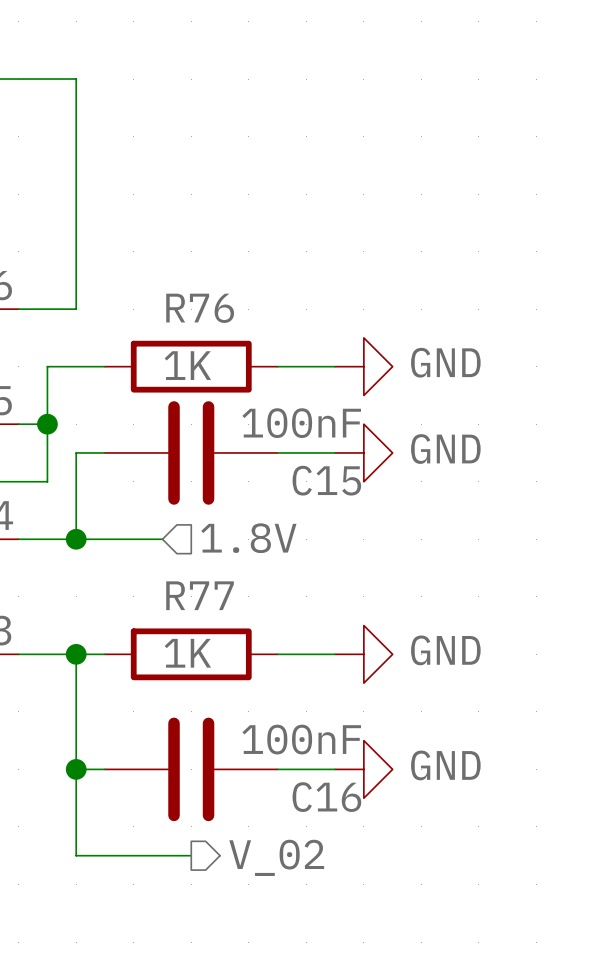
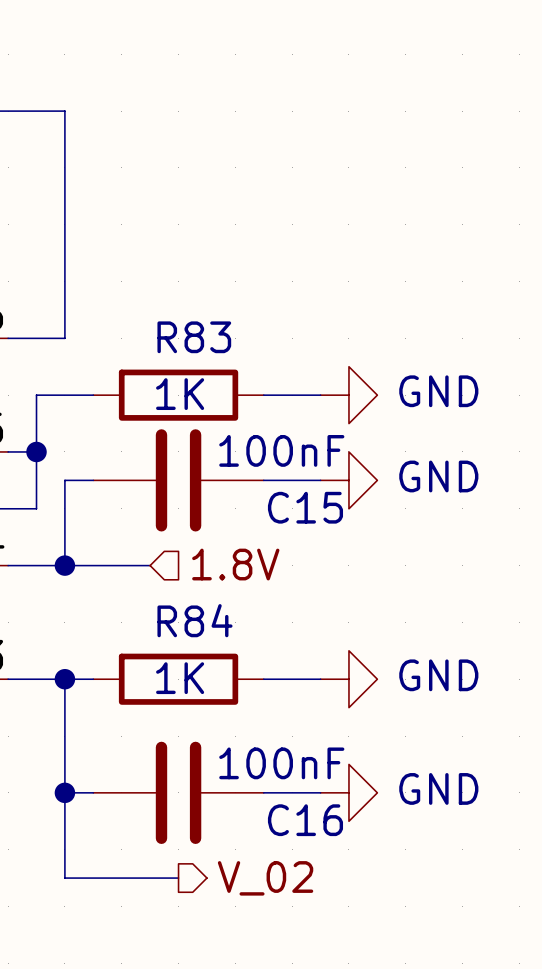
R76 name: R76 (200, 308) -> R83 (194, 337)
R77 name: R77 (200, 595) -> R84 (194, 620)

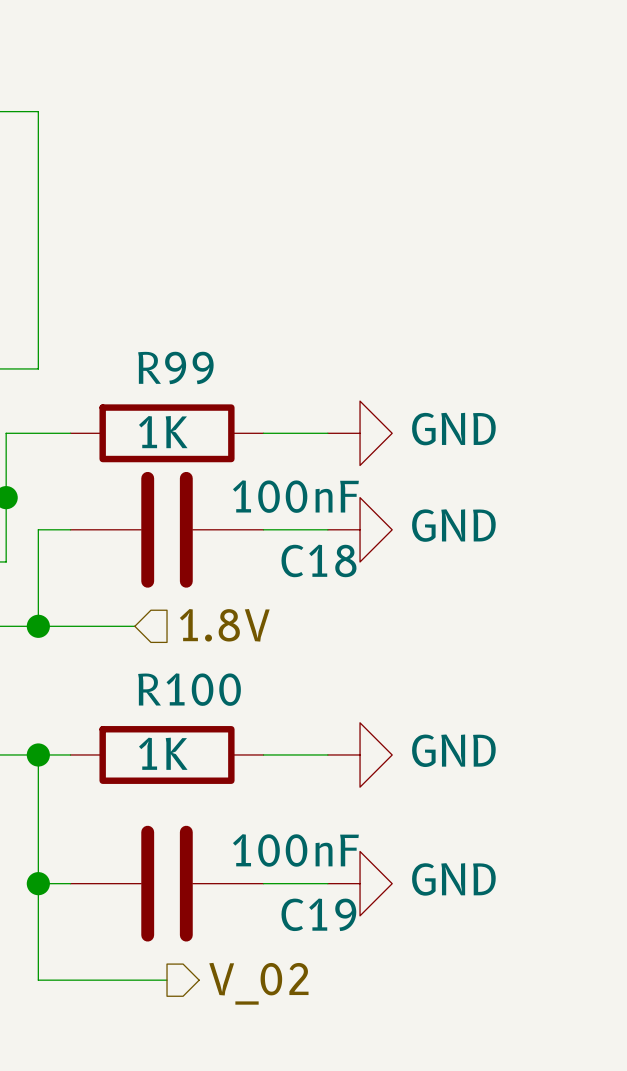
R83 name: R83 (194, 337) -> R99 (175, 367)
C15 name: C15 (305, 507) -> C18 (318, 560)
R84 name: R84 (194, 620) -> R100 (189, 689)
C16 name: C16 (305, 820) -> C19 (318, 914)

